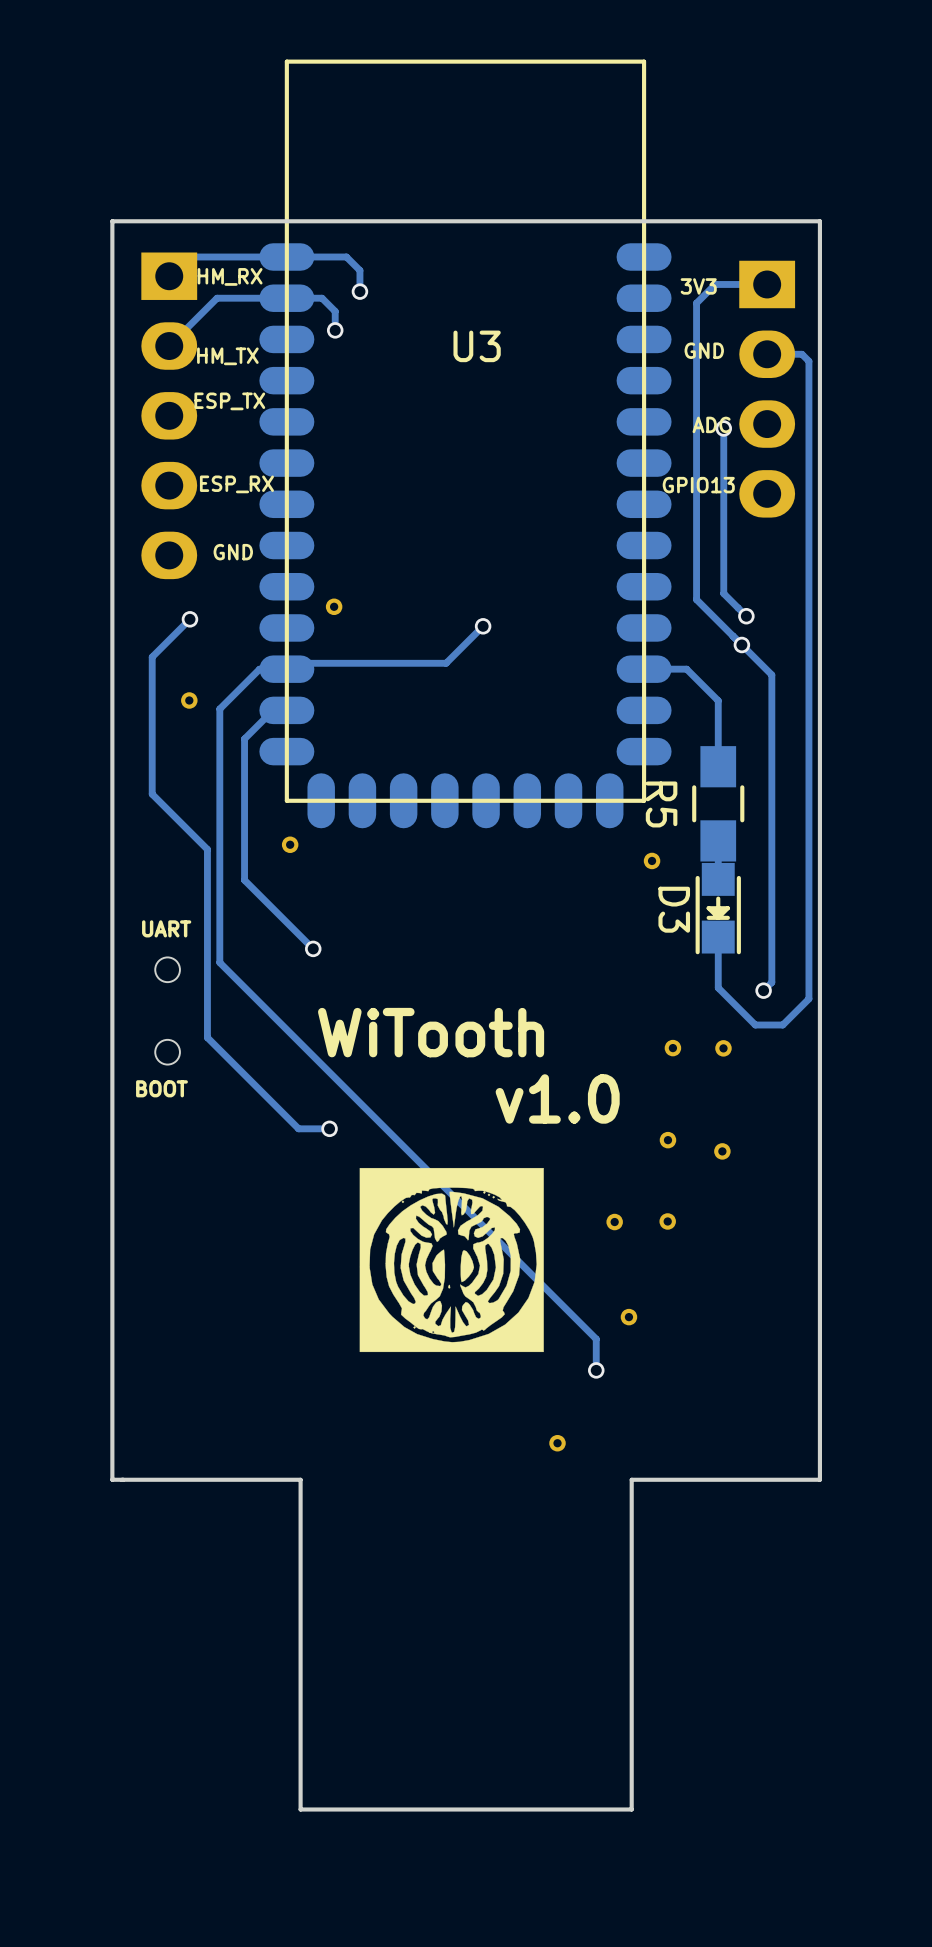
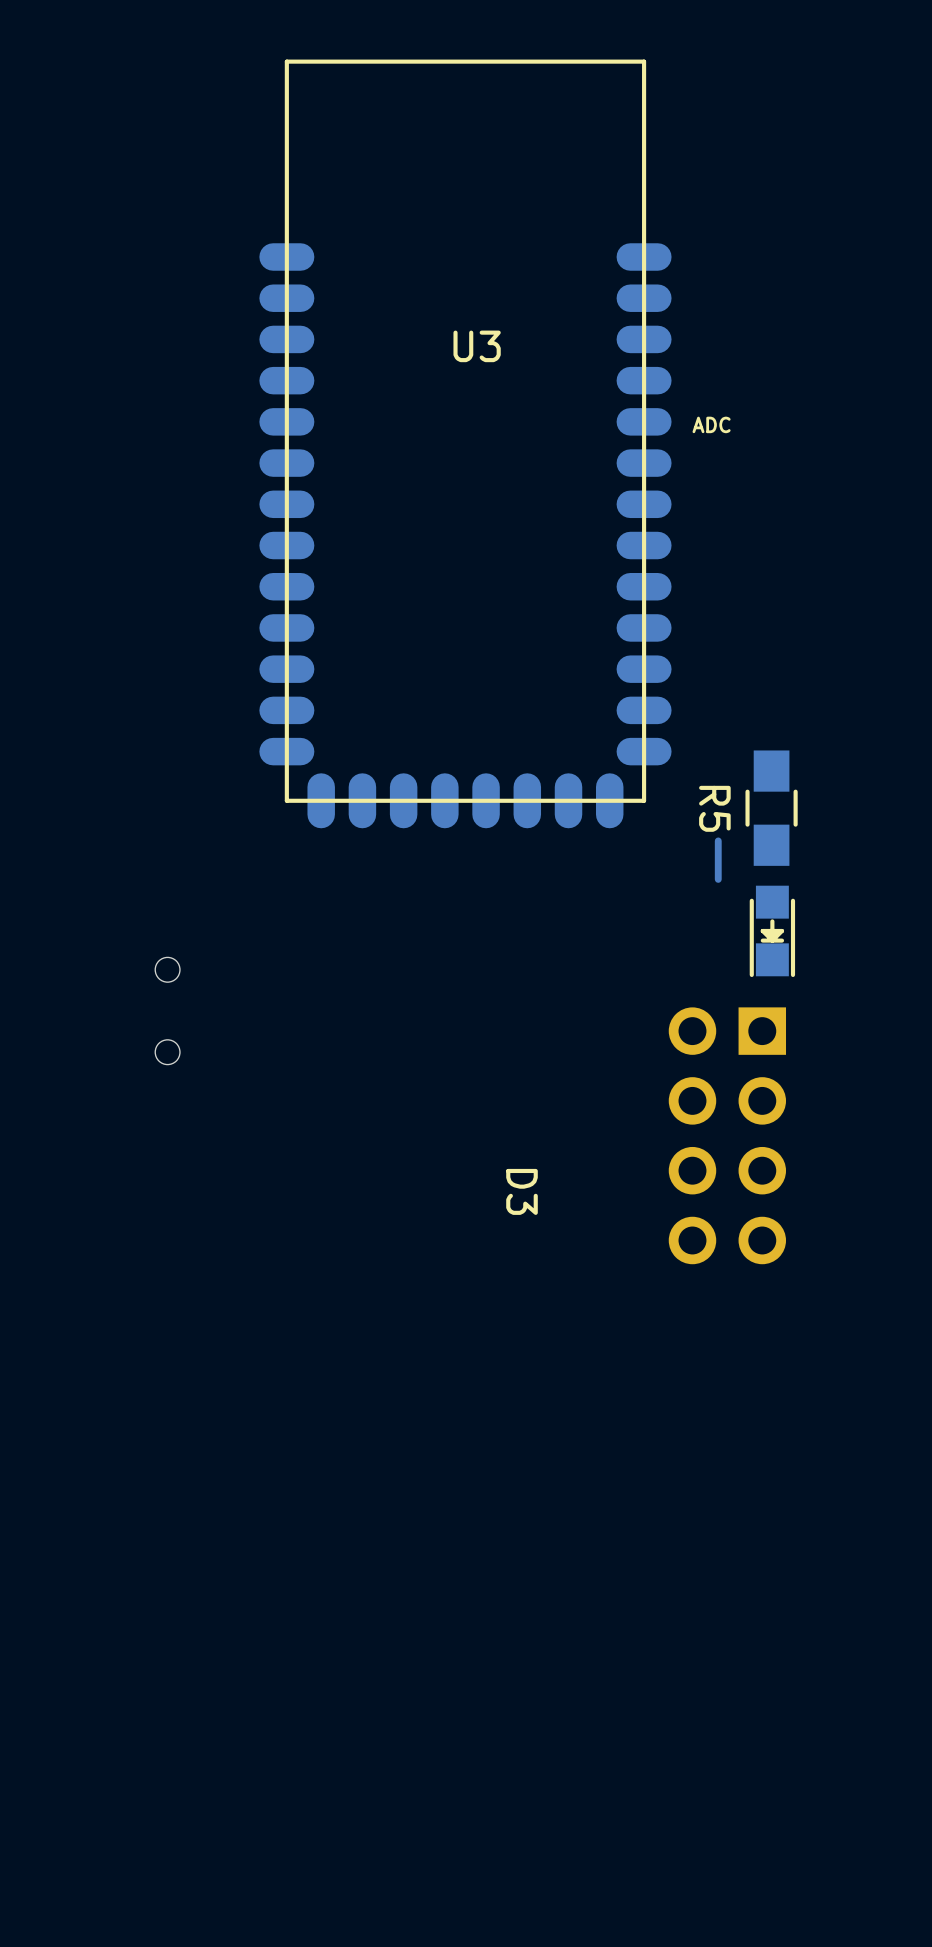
board edge: (819, 221) (819, 1479) (631, 1479) (631, 1809) (300, 1809) (300, 1479) (112, 1479) (112, 221) (819, 221) -> none
track: (169, 276) (188, 257) (346, 257) (359, 270) (359, 291) -> none
text: HM_RX (230, 276) -> none
track: (771, 284) (715, 284) (696, 303) (696, 599) (771, 674) (771, 982) (763, 990) -> none
text: 3V3 (698, 286) -> none
via: (359, 291) -> none
track: (335, 330) (335, 311) (322, 298) (217, 298) (169, 346) -> none
via: (335, 330) -> none
text: GND (704, 350) -> none
track: (767, 354) (801, 354) (808, 361) (808, 998) (782, 1025) (755, 1025) (718, 987) (718, 937) -> none
text: HM_TX (227, 356) -> none
part: (767, 389) -> none
text: ESP_TX (229, 401) -> none
part: (169, 415) -> none
track: (723, 428) (723, 593) (746, 616) -> none
via: (723, 428) -> none
text: ESP_RX (236, 484) -> none
text: GPIO13 (698, 485) -> none
text: GND (233, 552) -> none
part: (334, 606) -> none
via: (746, 616) -> none
track: (189, 619) (152, 657) (152, 794) (207, 849) (207, 1037) (298, 1128) (329, 1128) -> none
via: (189, 619) -> none
track: (483, 626) (446, 663) (292, 663) -> none
via: (483, 626) -> none
via: (741, 644) -> none
track: (286, 669) (259, 669) (219, 709) (219, 962) (596, 1339) (596, 1370) -> none
track: (644, 669) (686, 669) (718, 700) (718, 766) -> none
part: (189, 700) -> none
track: (286, 710) (273, 710) (244, 738) (244, 880) (313, 948) -> none
R5 position: (718, 803) -> (771, 808)
part: (290, 844) -> none
part: (652, 860) -> none
D3 position: (718, 908) -> (772, 931)
D3 name position: D3 (674, 909) -> D3 (522, 1191)
text: UART (166, 928) -> none
via: (313, 948) -> none
via: (763, 990) -> none
text: WiTooth (431, 1032) -> none
part: (672, 1048) -> none
part: (723, 1048) -> none
text: BOOT (161, 1088) -> none
text: v1.0 (557, 1098) -> none
via: (329, 1128) -> none
part: (667, 1140) -> none
part footprint: [714, 1143, 731, 1160] -> [668, 1007, 787, 1265]
drawing: [359, 1167, 544, 1353] -> none
part: (667, 1221) -> none
part: (614, 1222) -> none
part: (628, 1317) -> none
via: (596, 1370) -> none
part: (557, 1443) -> none

